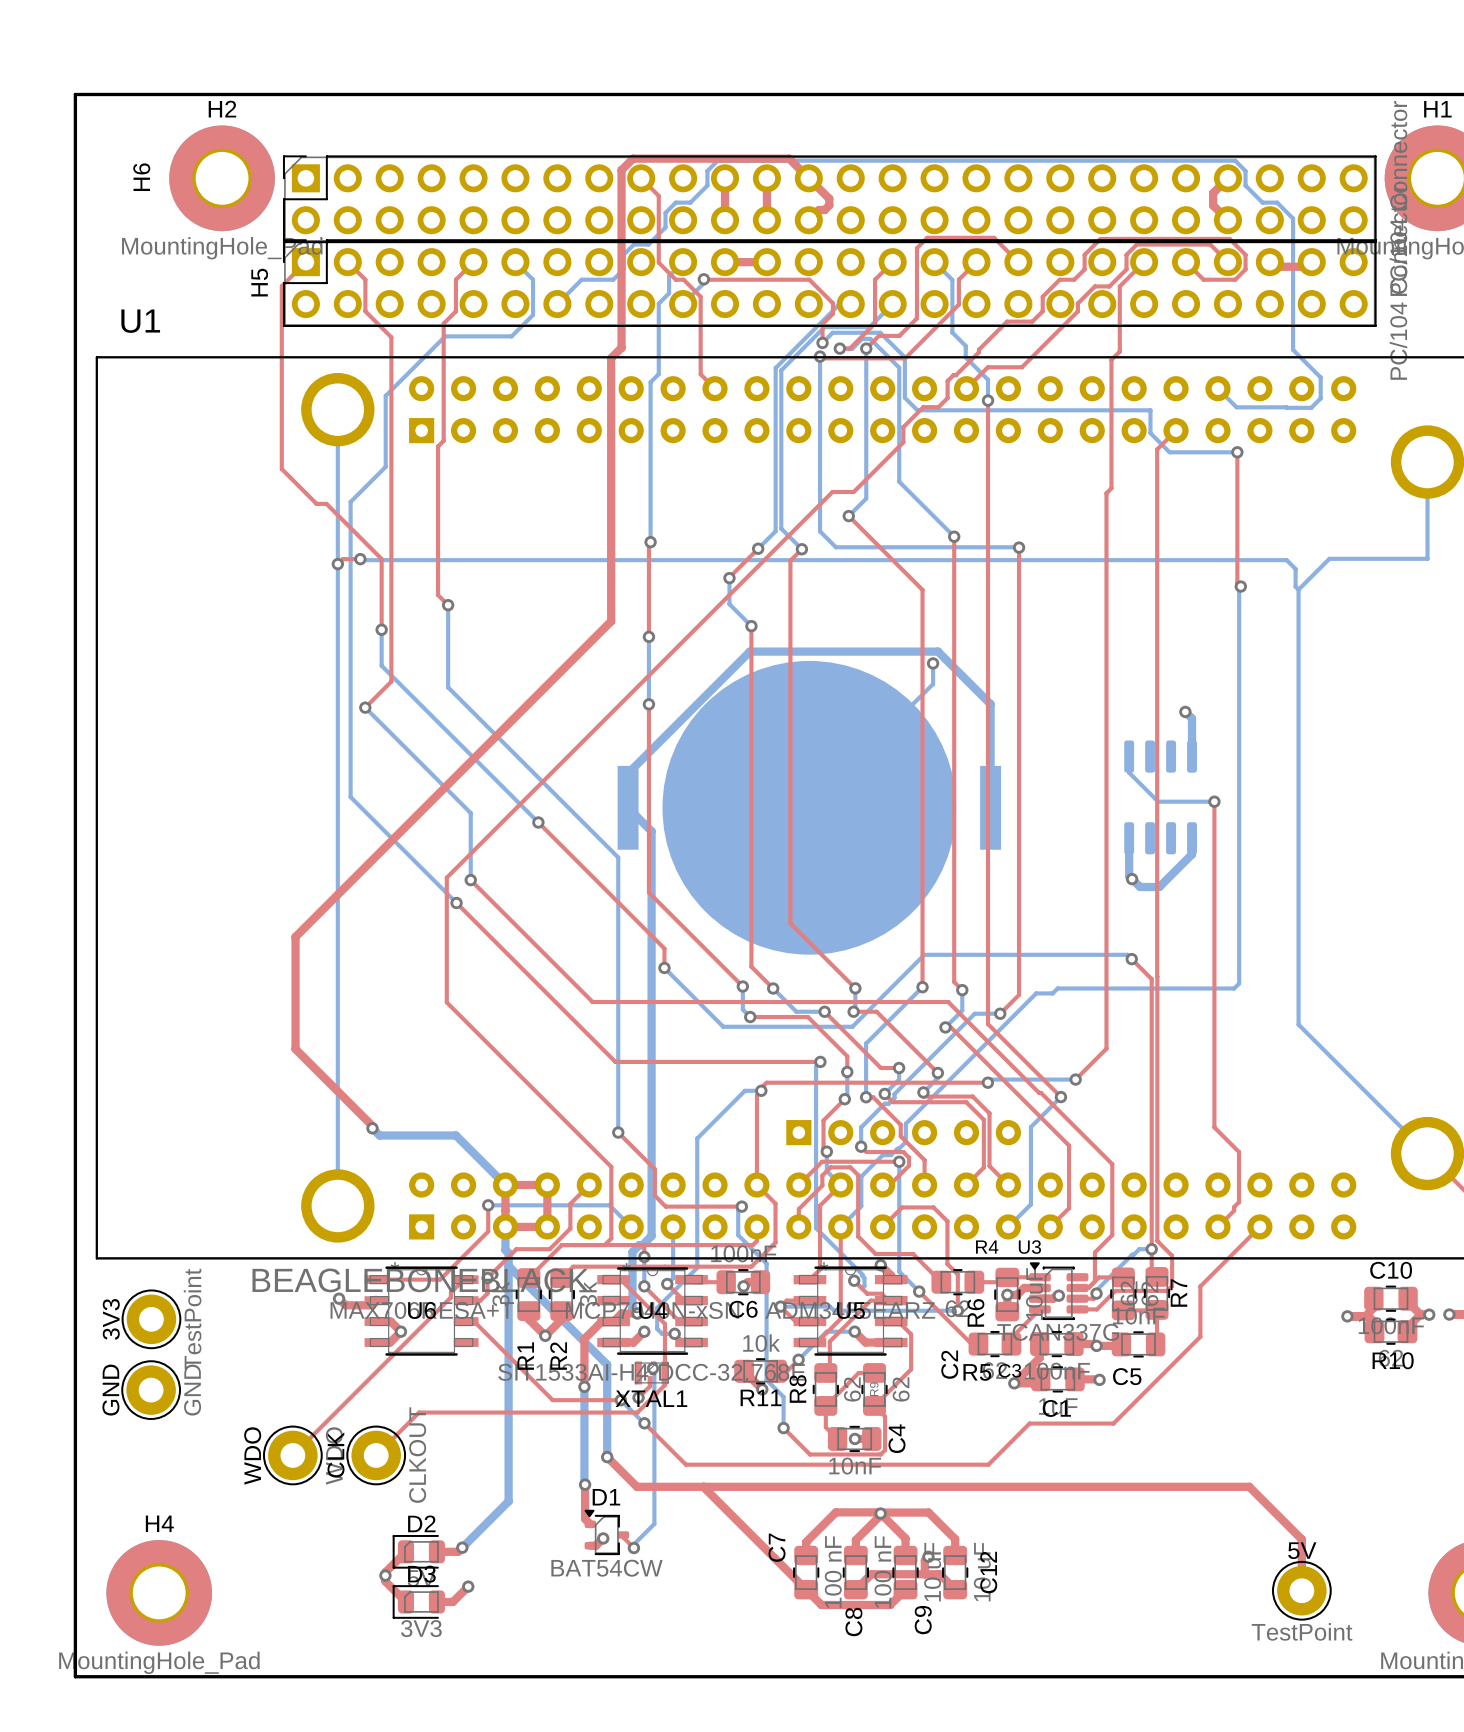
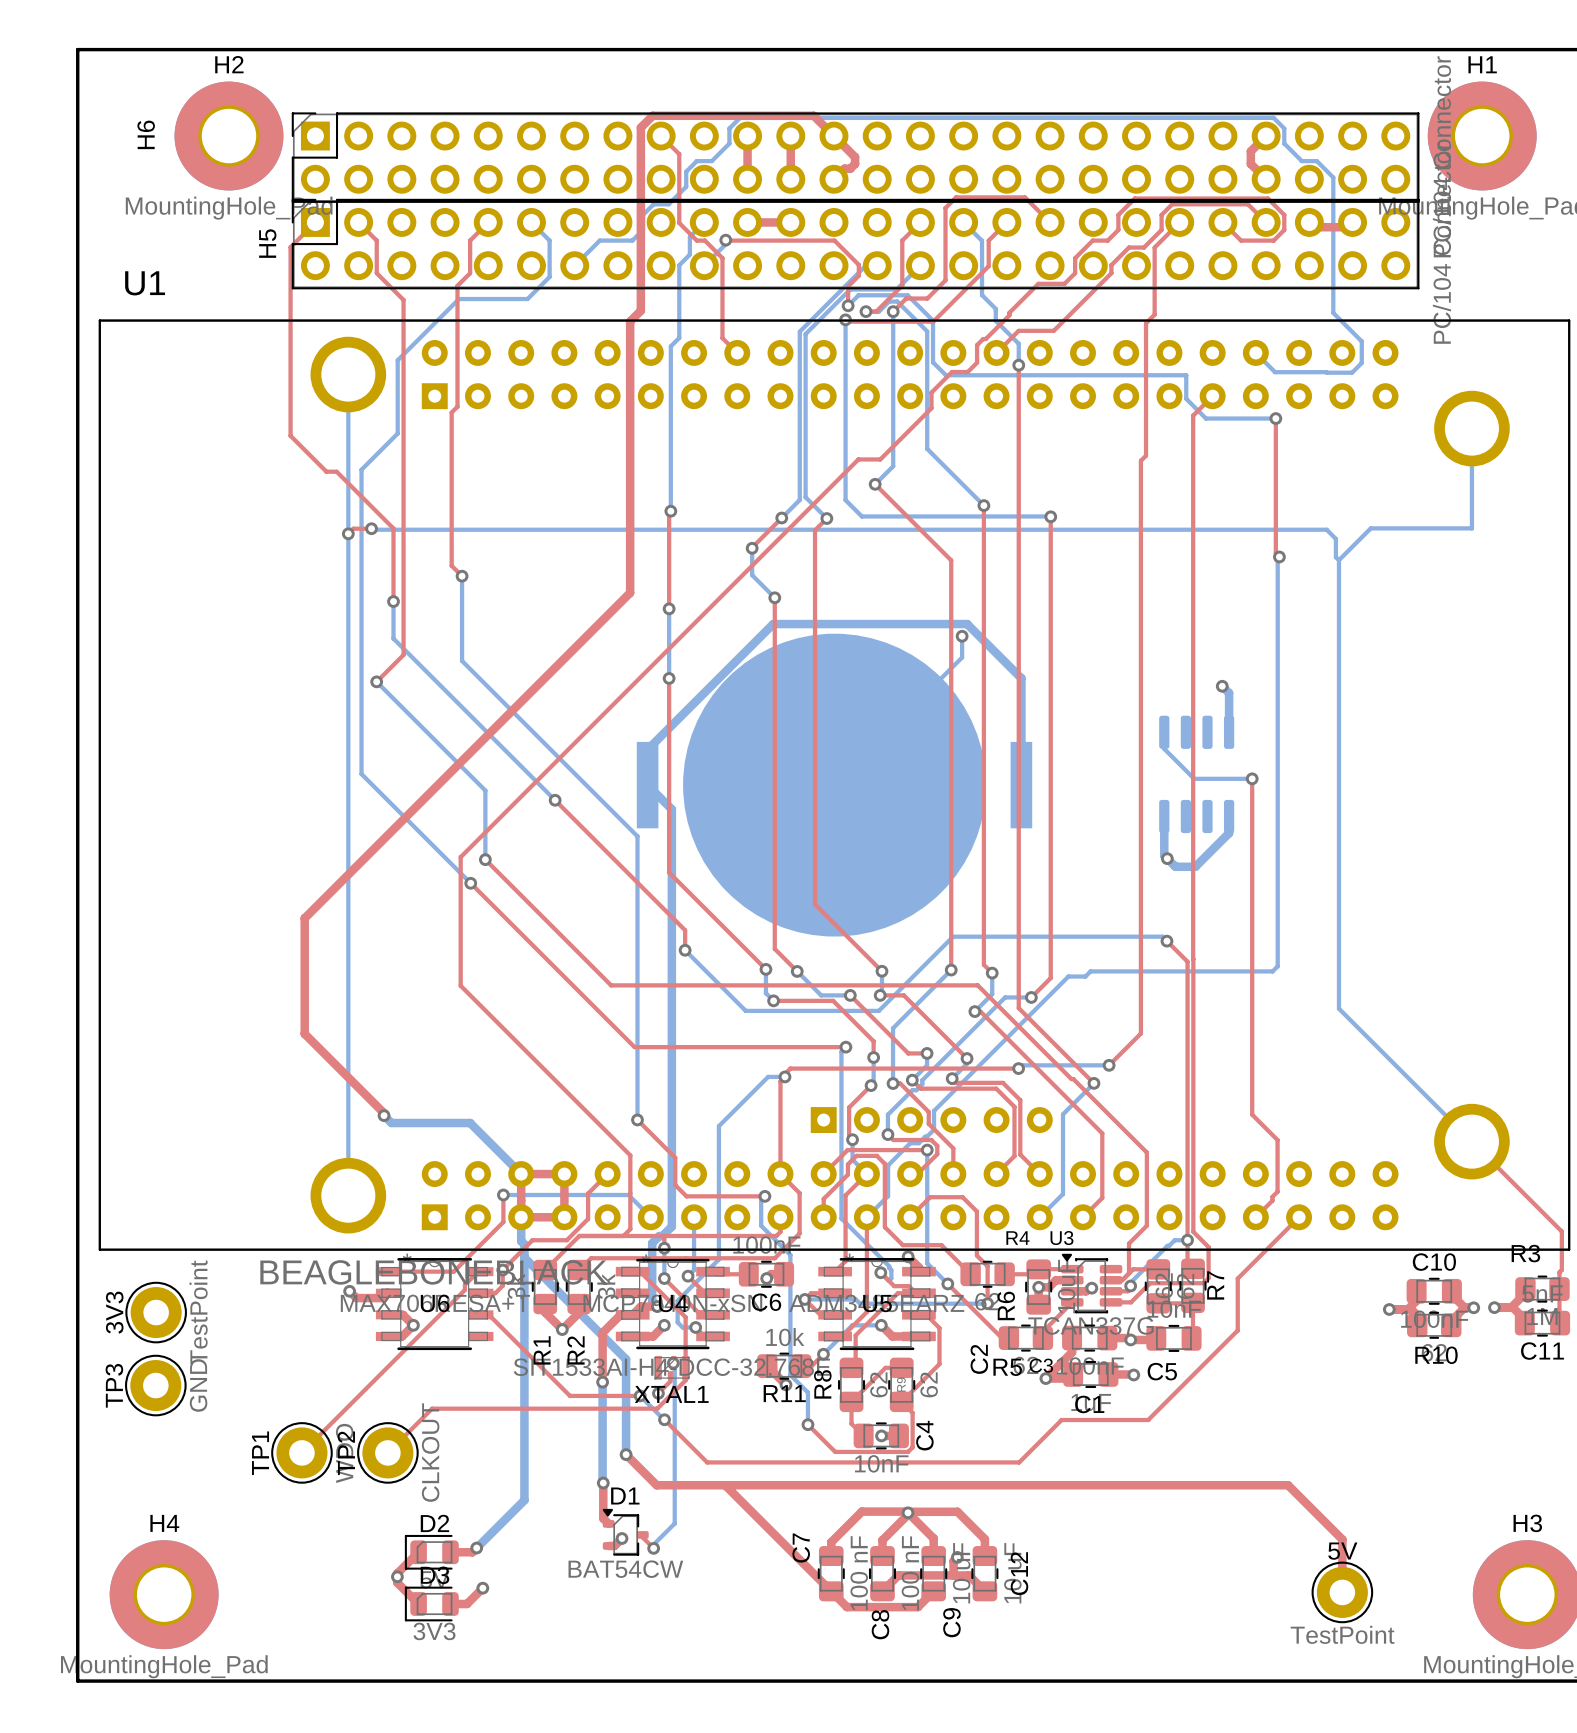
GND name: GND (110, 1390) -> TP3 (114, 1385)
CLK name: CLK (336, 1454) -> TP2 (346, 1453)
WDO name: WDO (252, 1455) -> TP1 (260, 1453)

